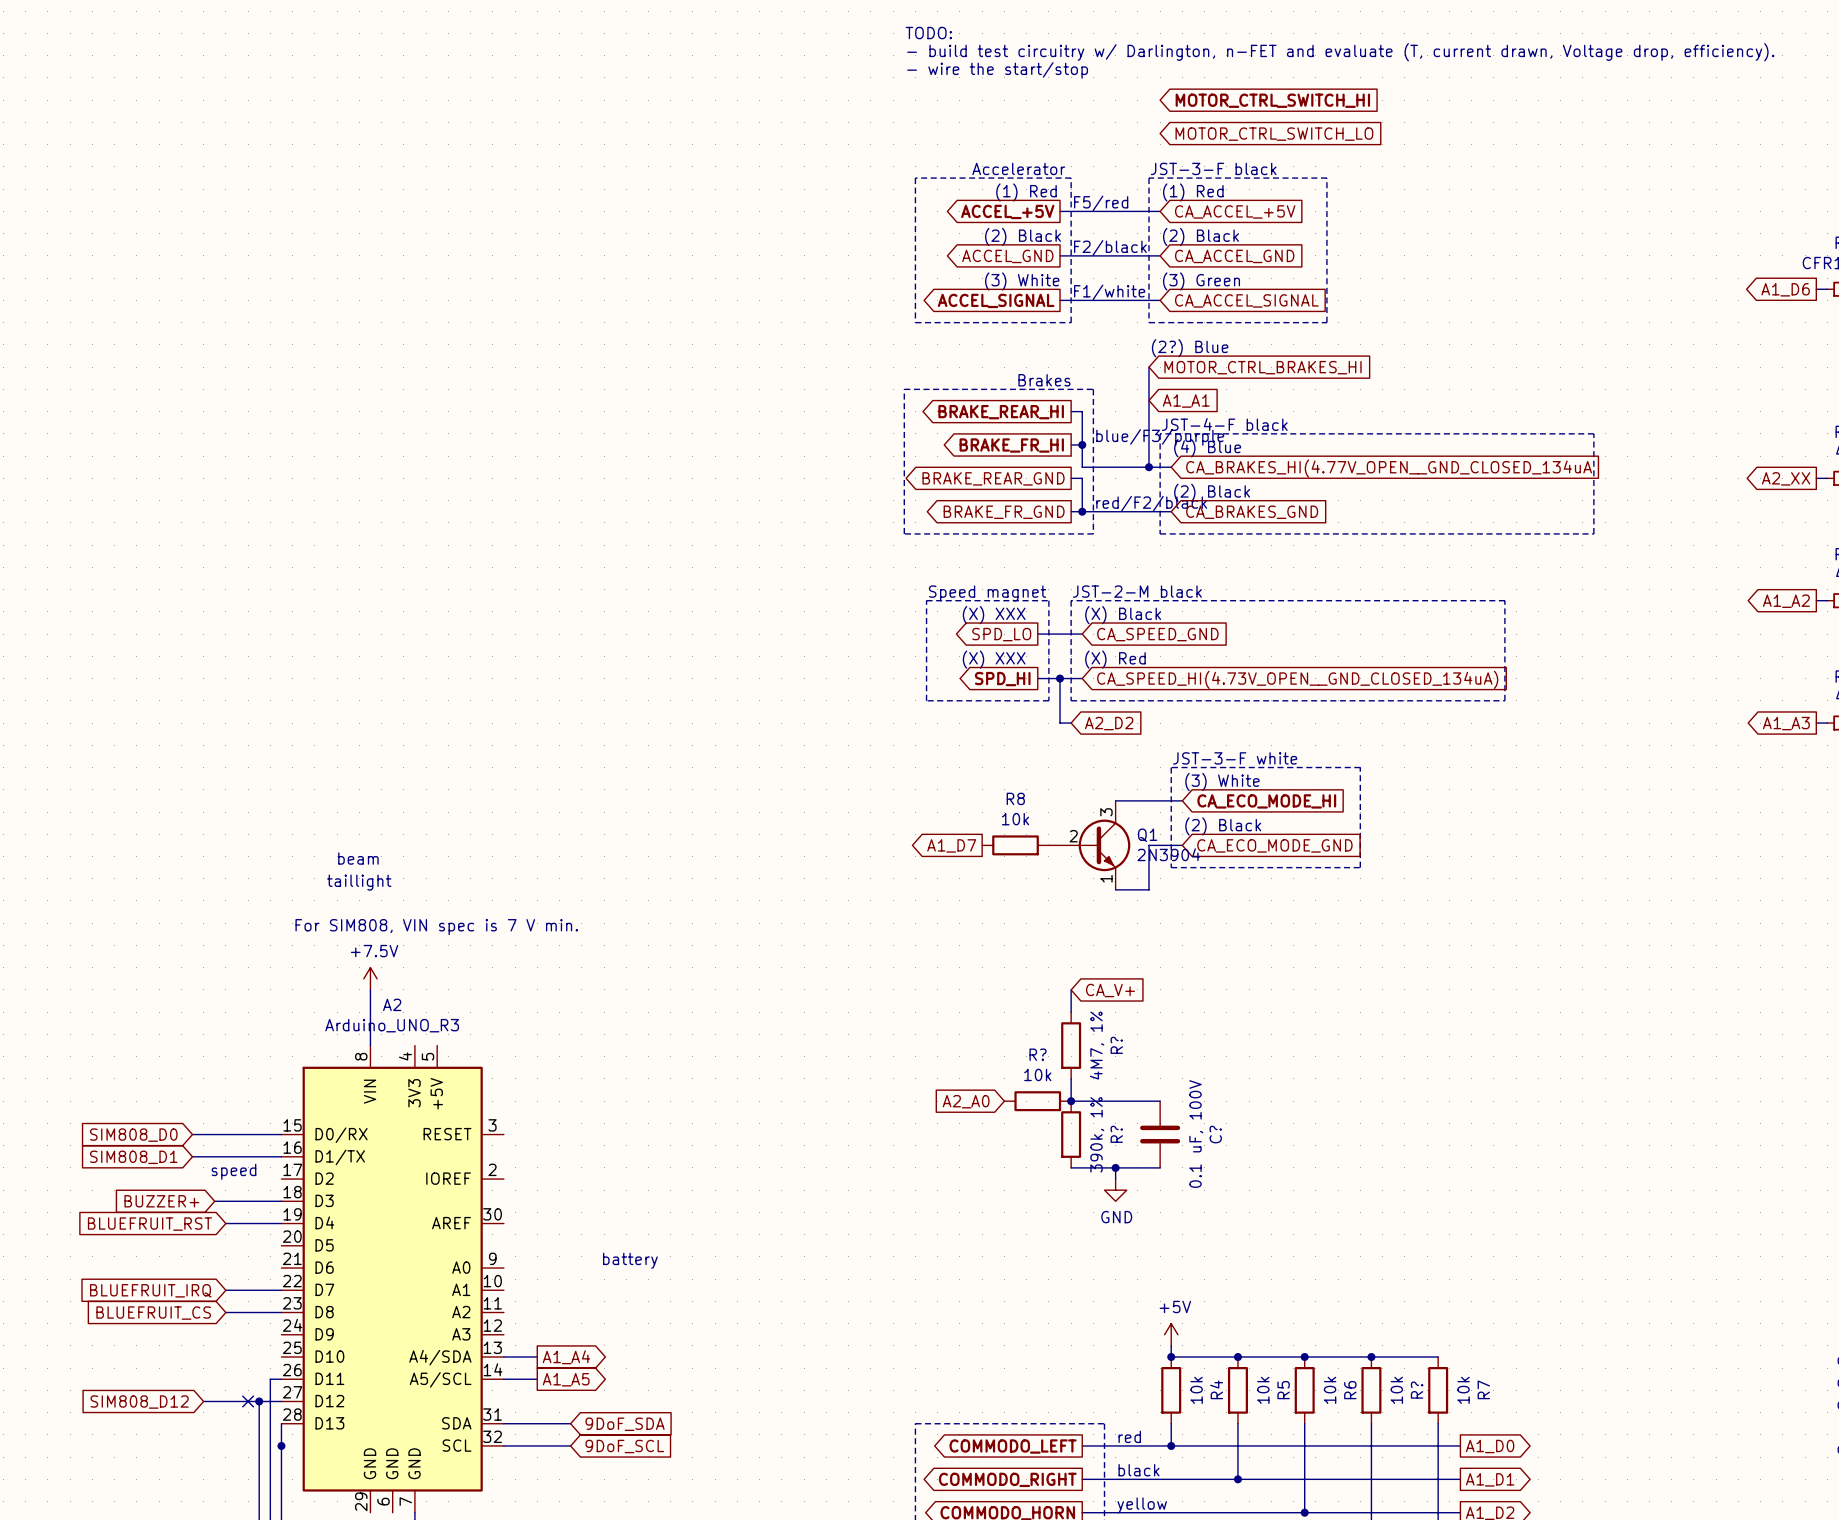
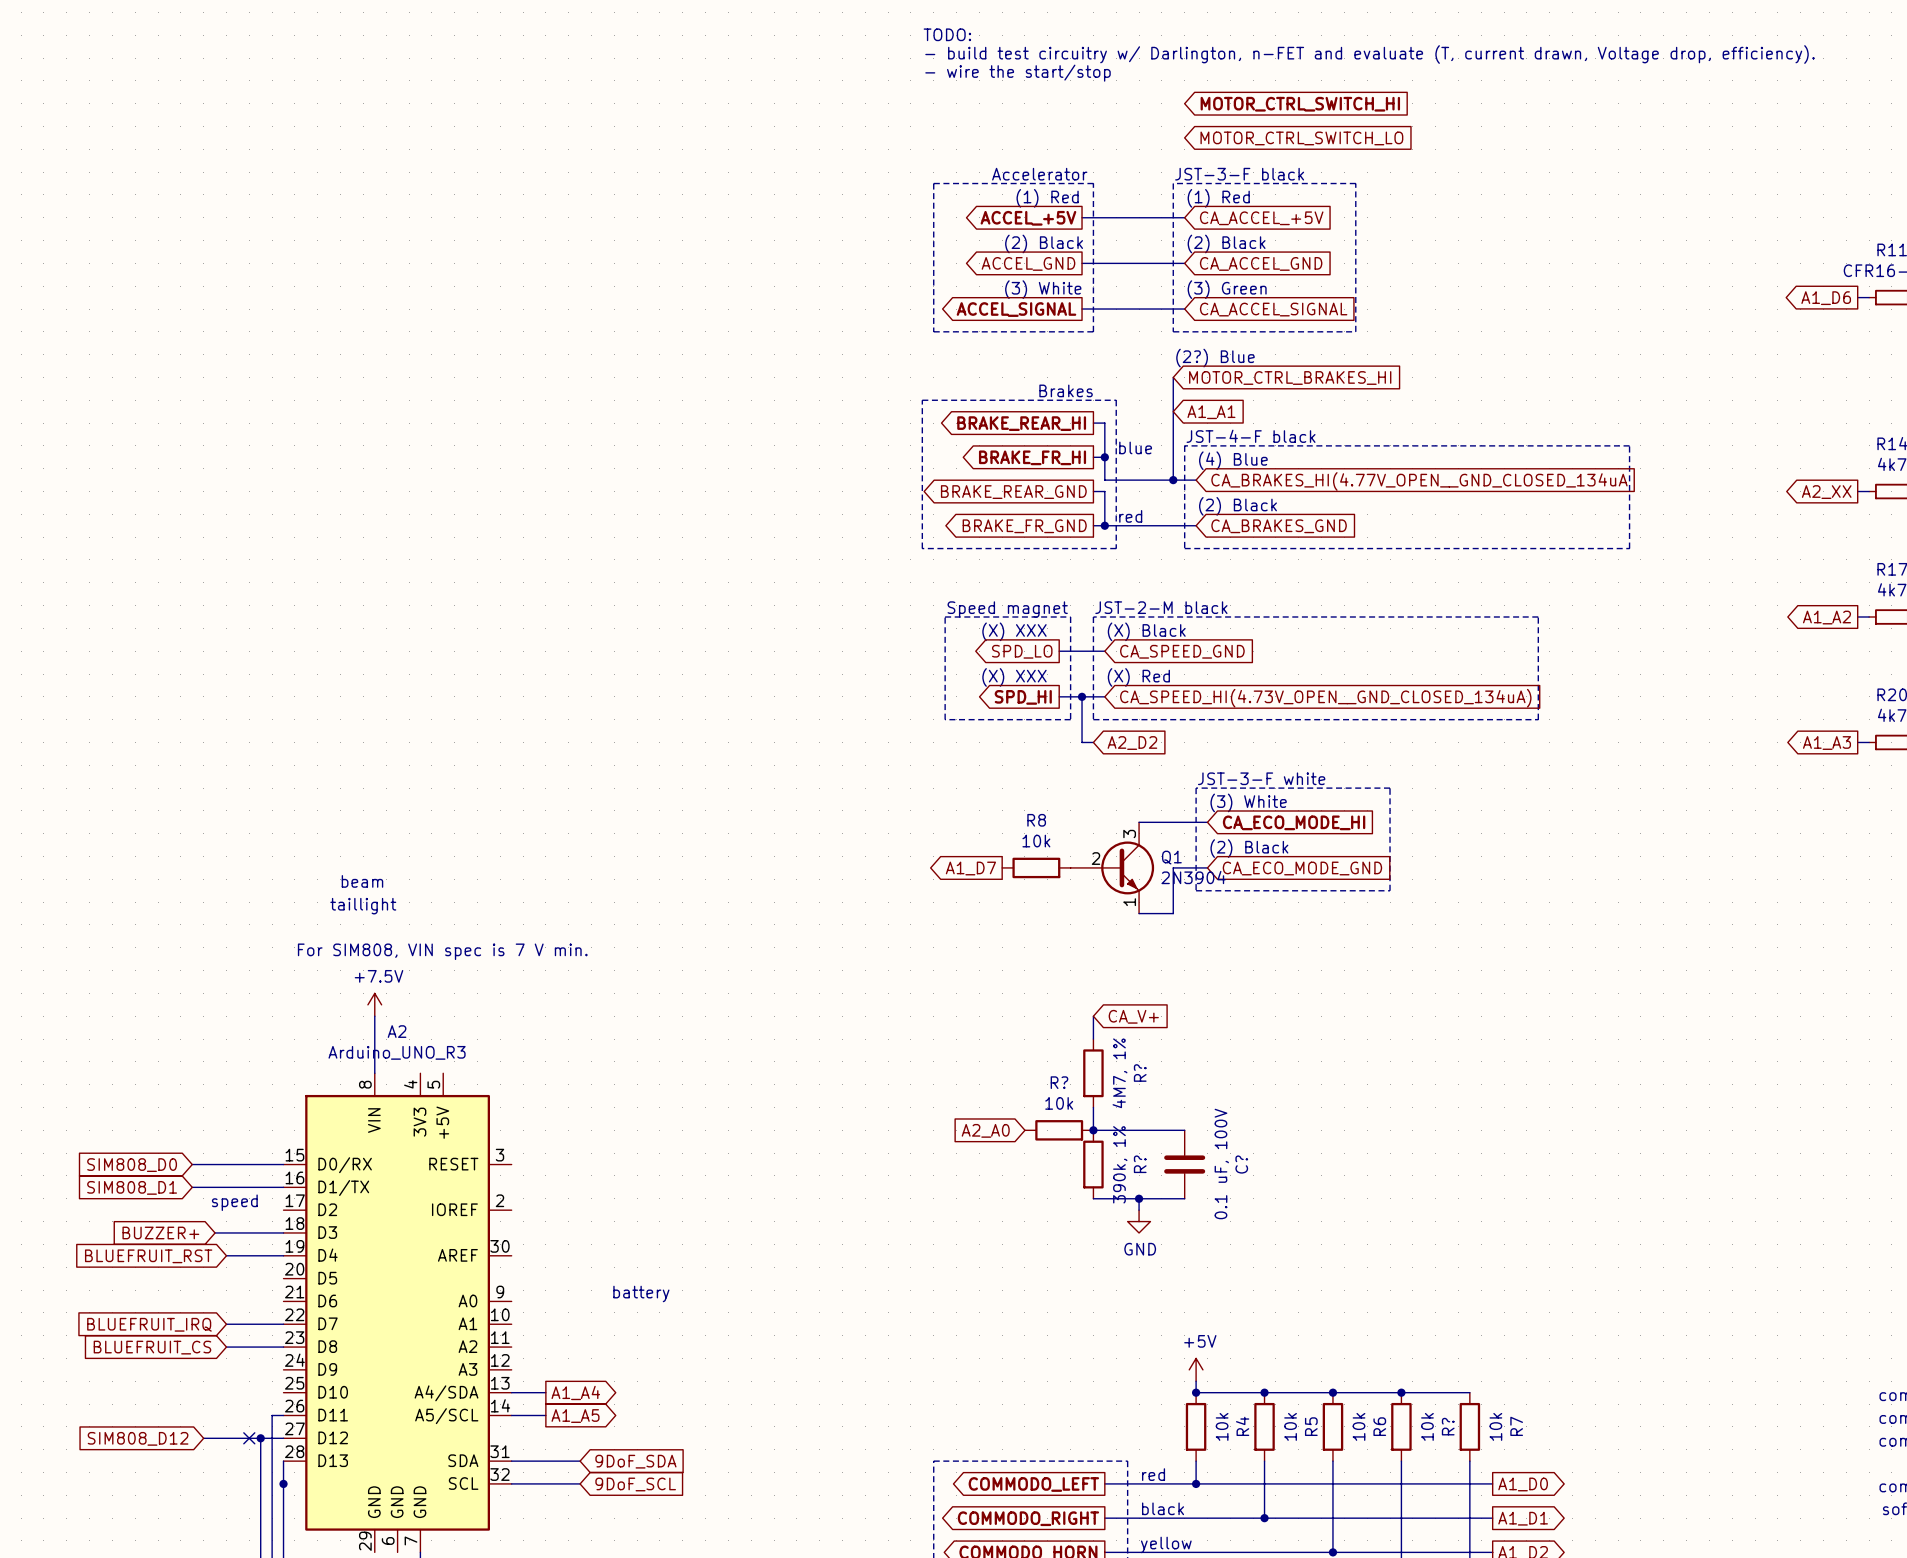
text: F5/red (1101, 203) -> none
text: F2/black (1110, 247) -> none
text: F1/white (1109, 292) -> none
text: blue/F3/purple (1160, 437) -> blue (1135, 447)
text: red/F2/black (1151, 503) -> red (1130, 516)

